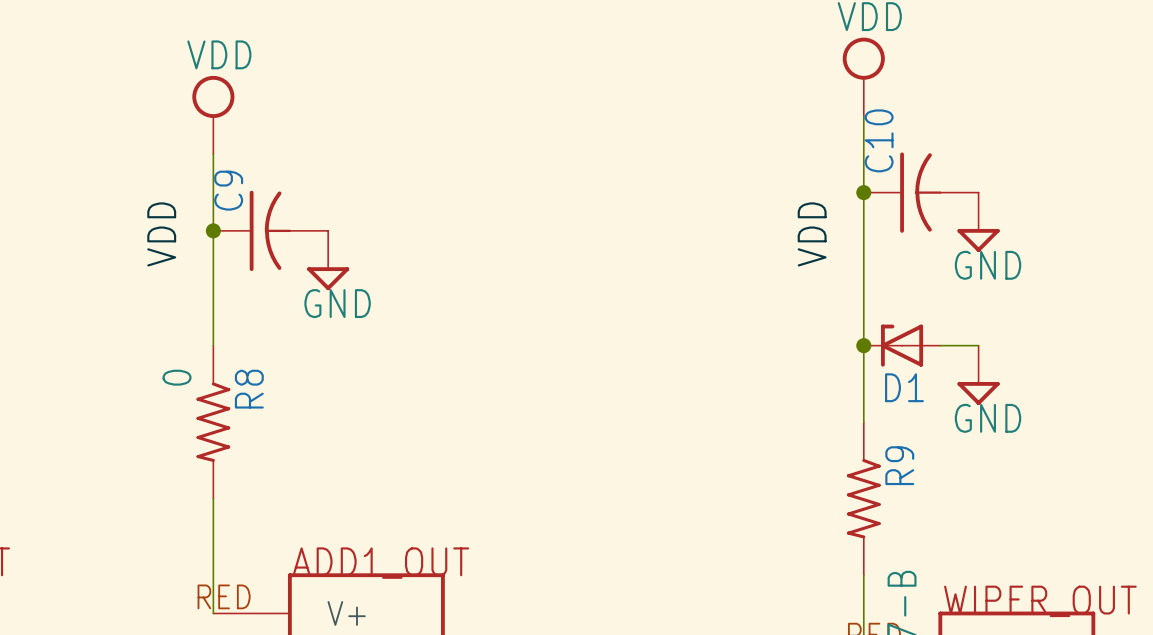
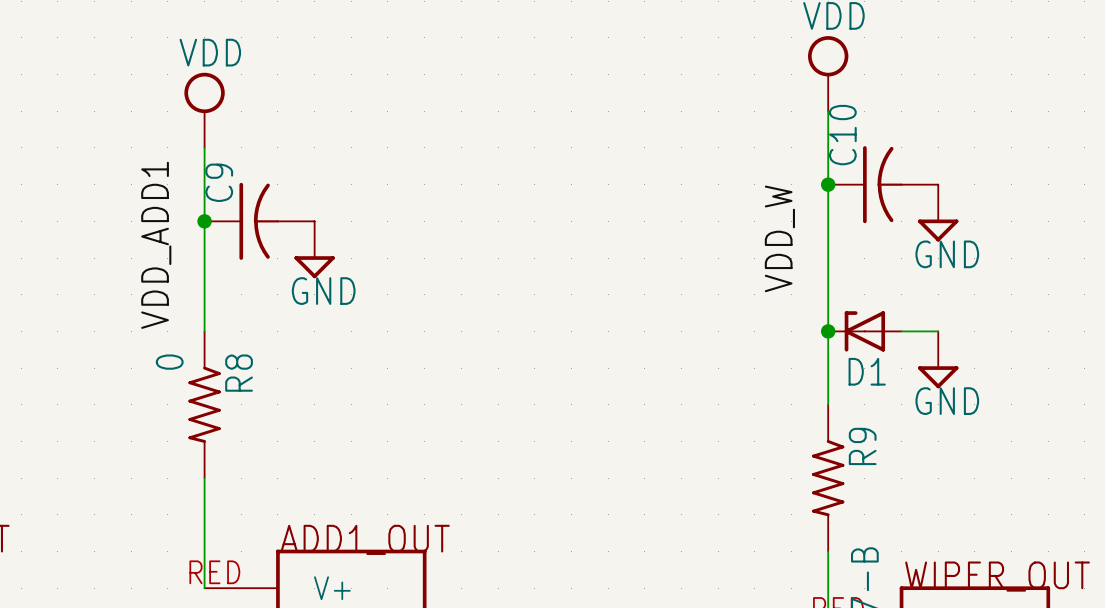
label: VDD (161, 234) -> none
label: VDD (812, 234) -> VDD_W (779, 238)
label: none -> VDD_ADD1 (156, 245)

